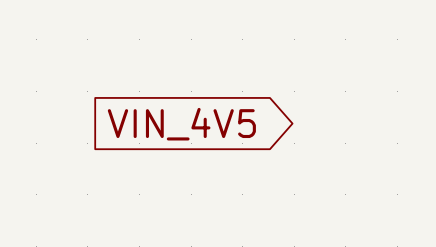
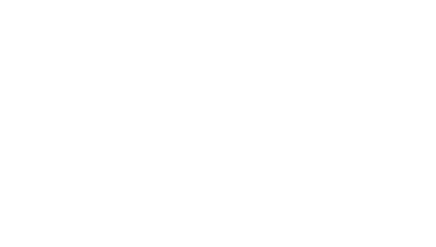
global label: VIN_4V5 (181, 124) -> none

